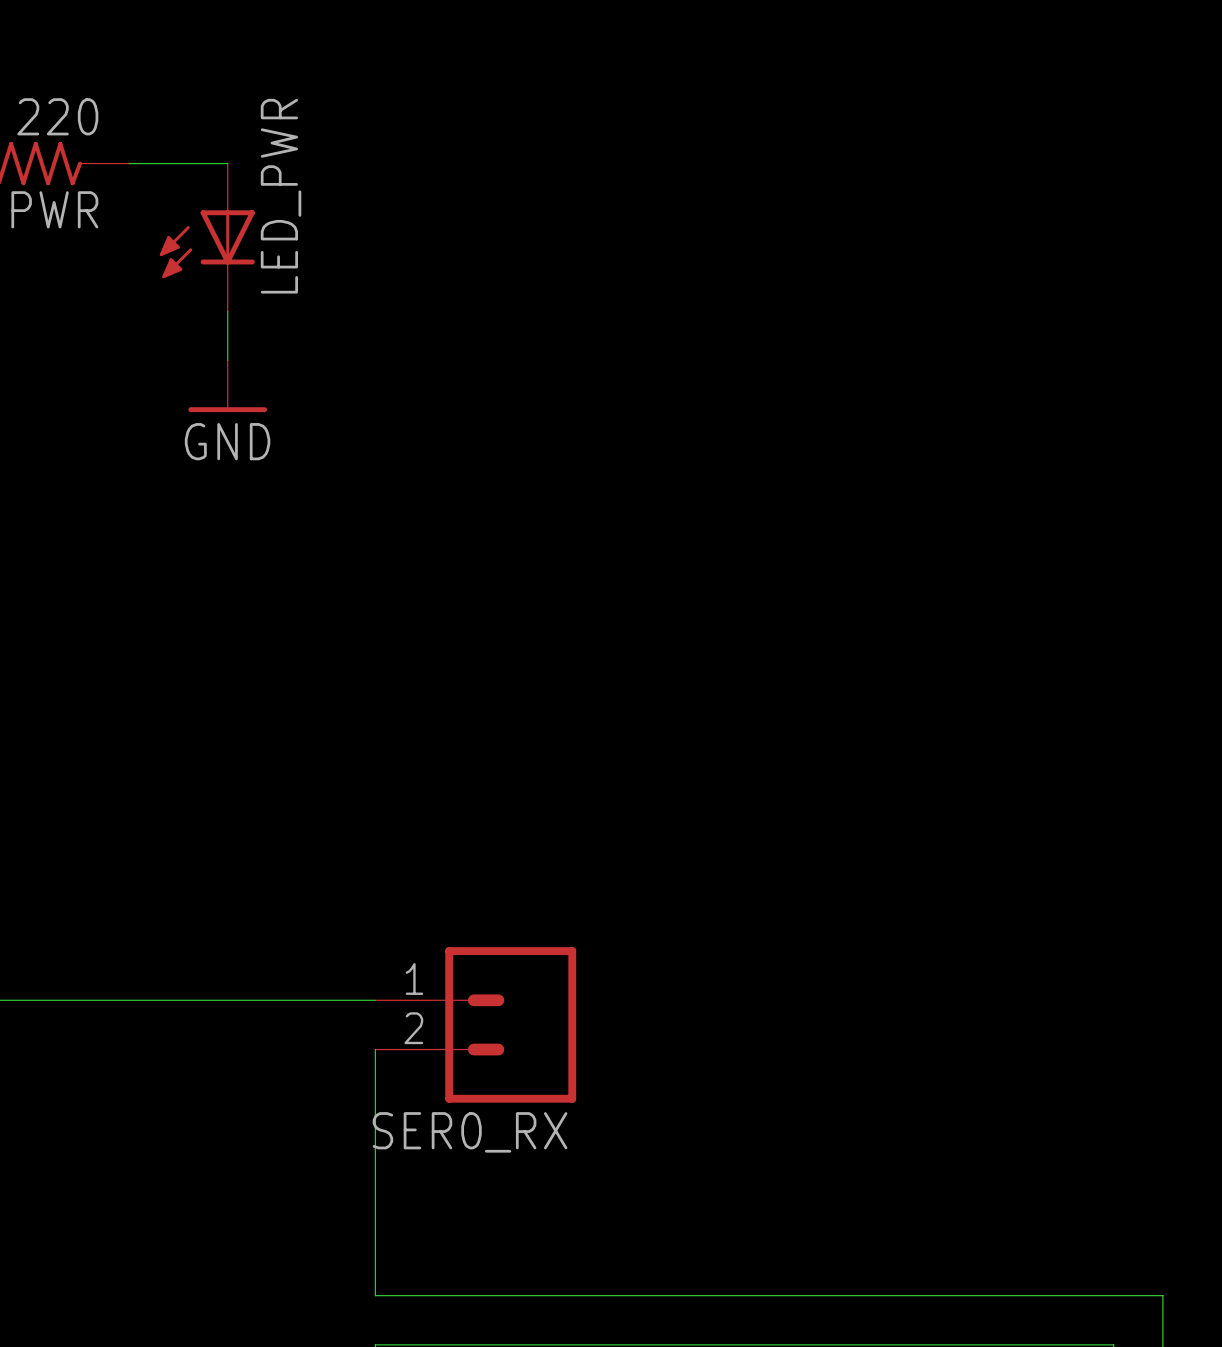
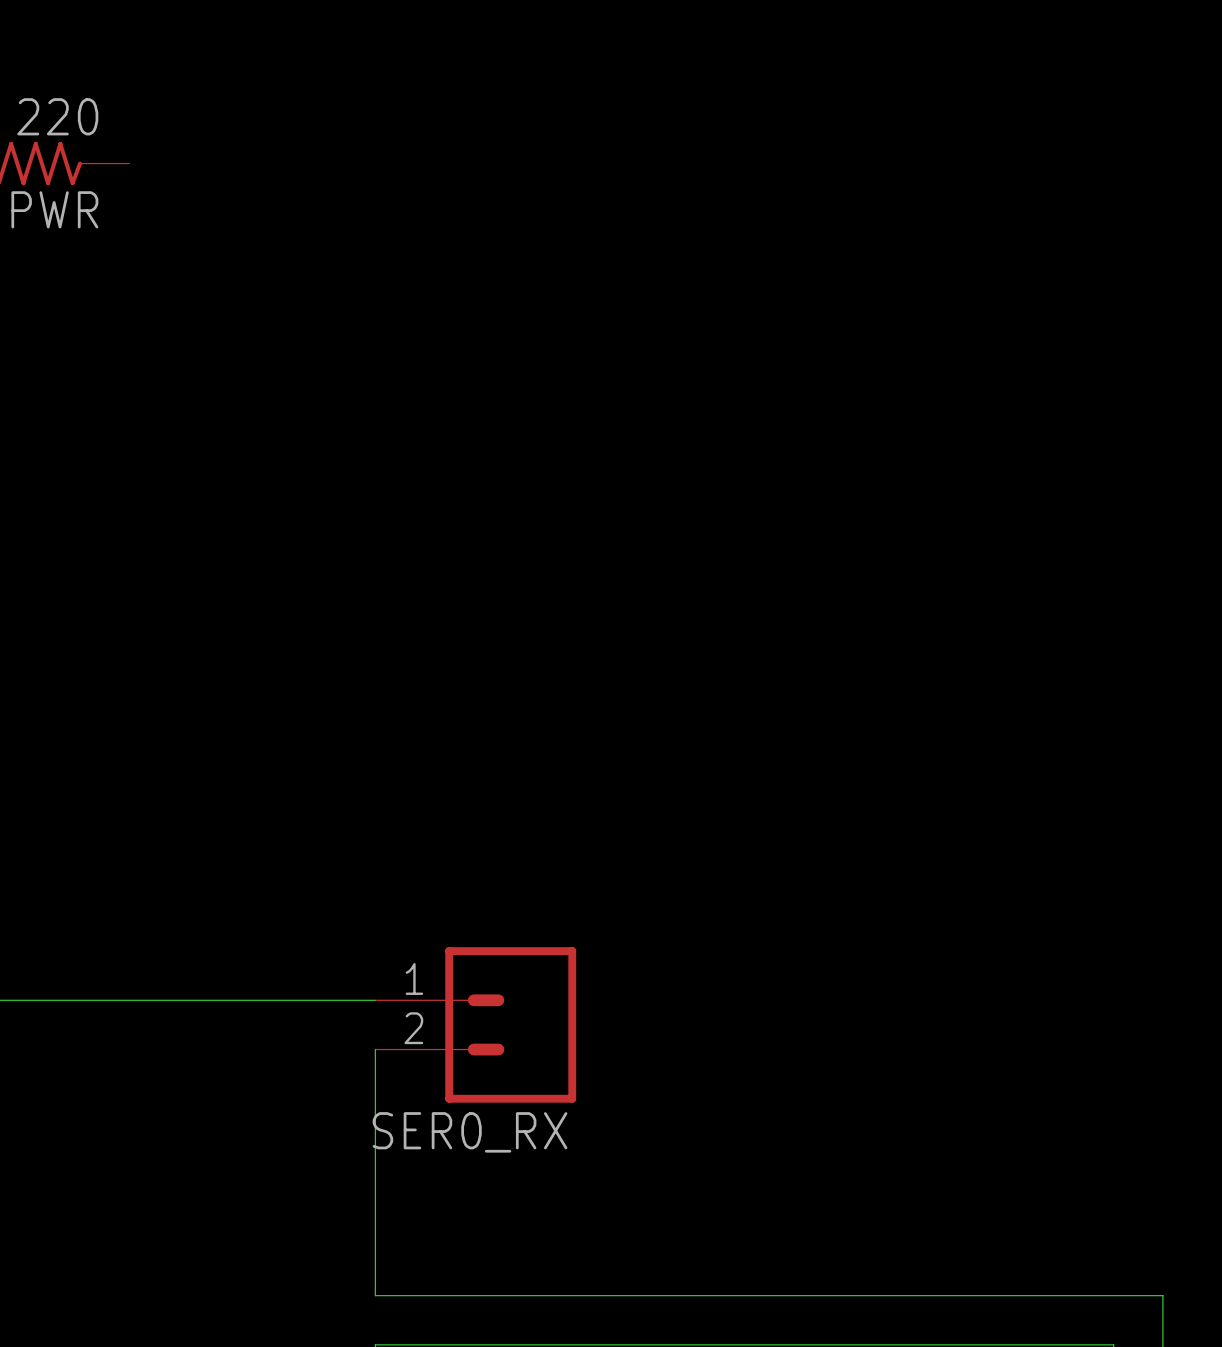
wire: (129, 163) (227, 163) -> none
LED_PWR: (207, 237) -> none
wire: (227, 311) (227, 360) -> none
power symbol: GND (227, 386) -> none

